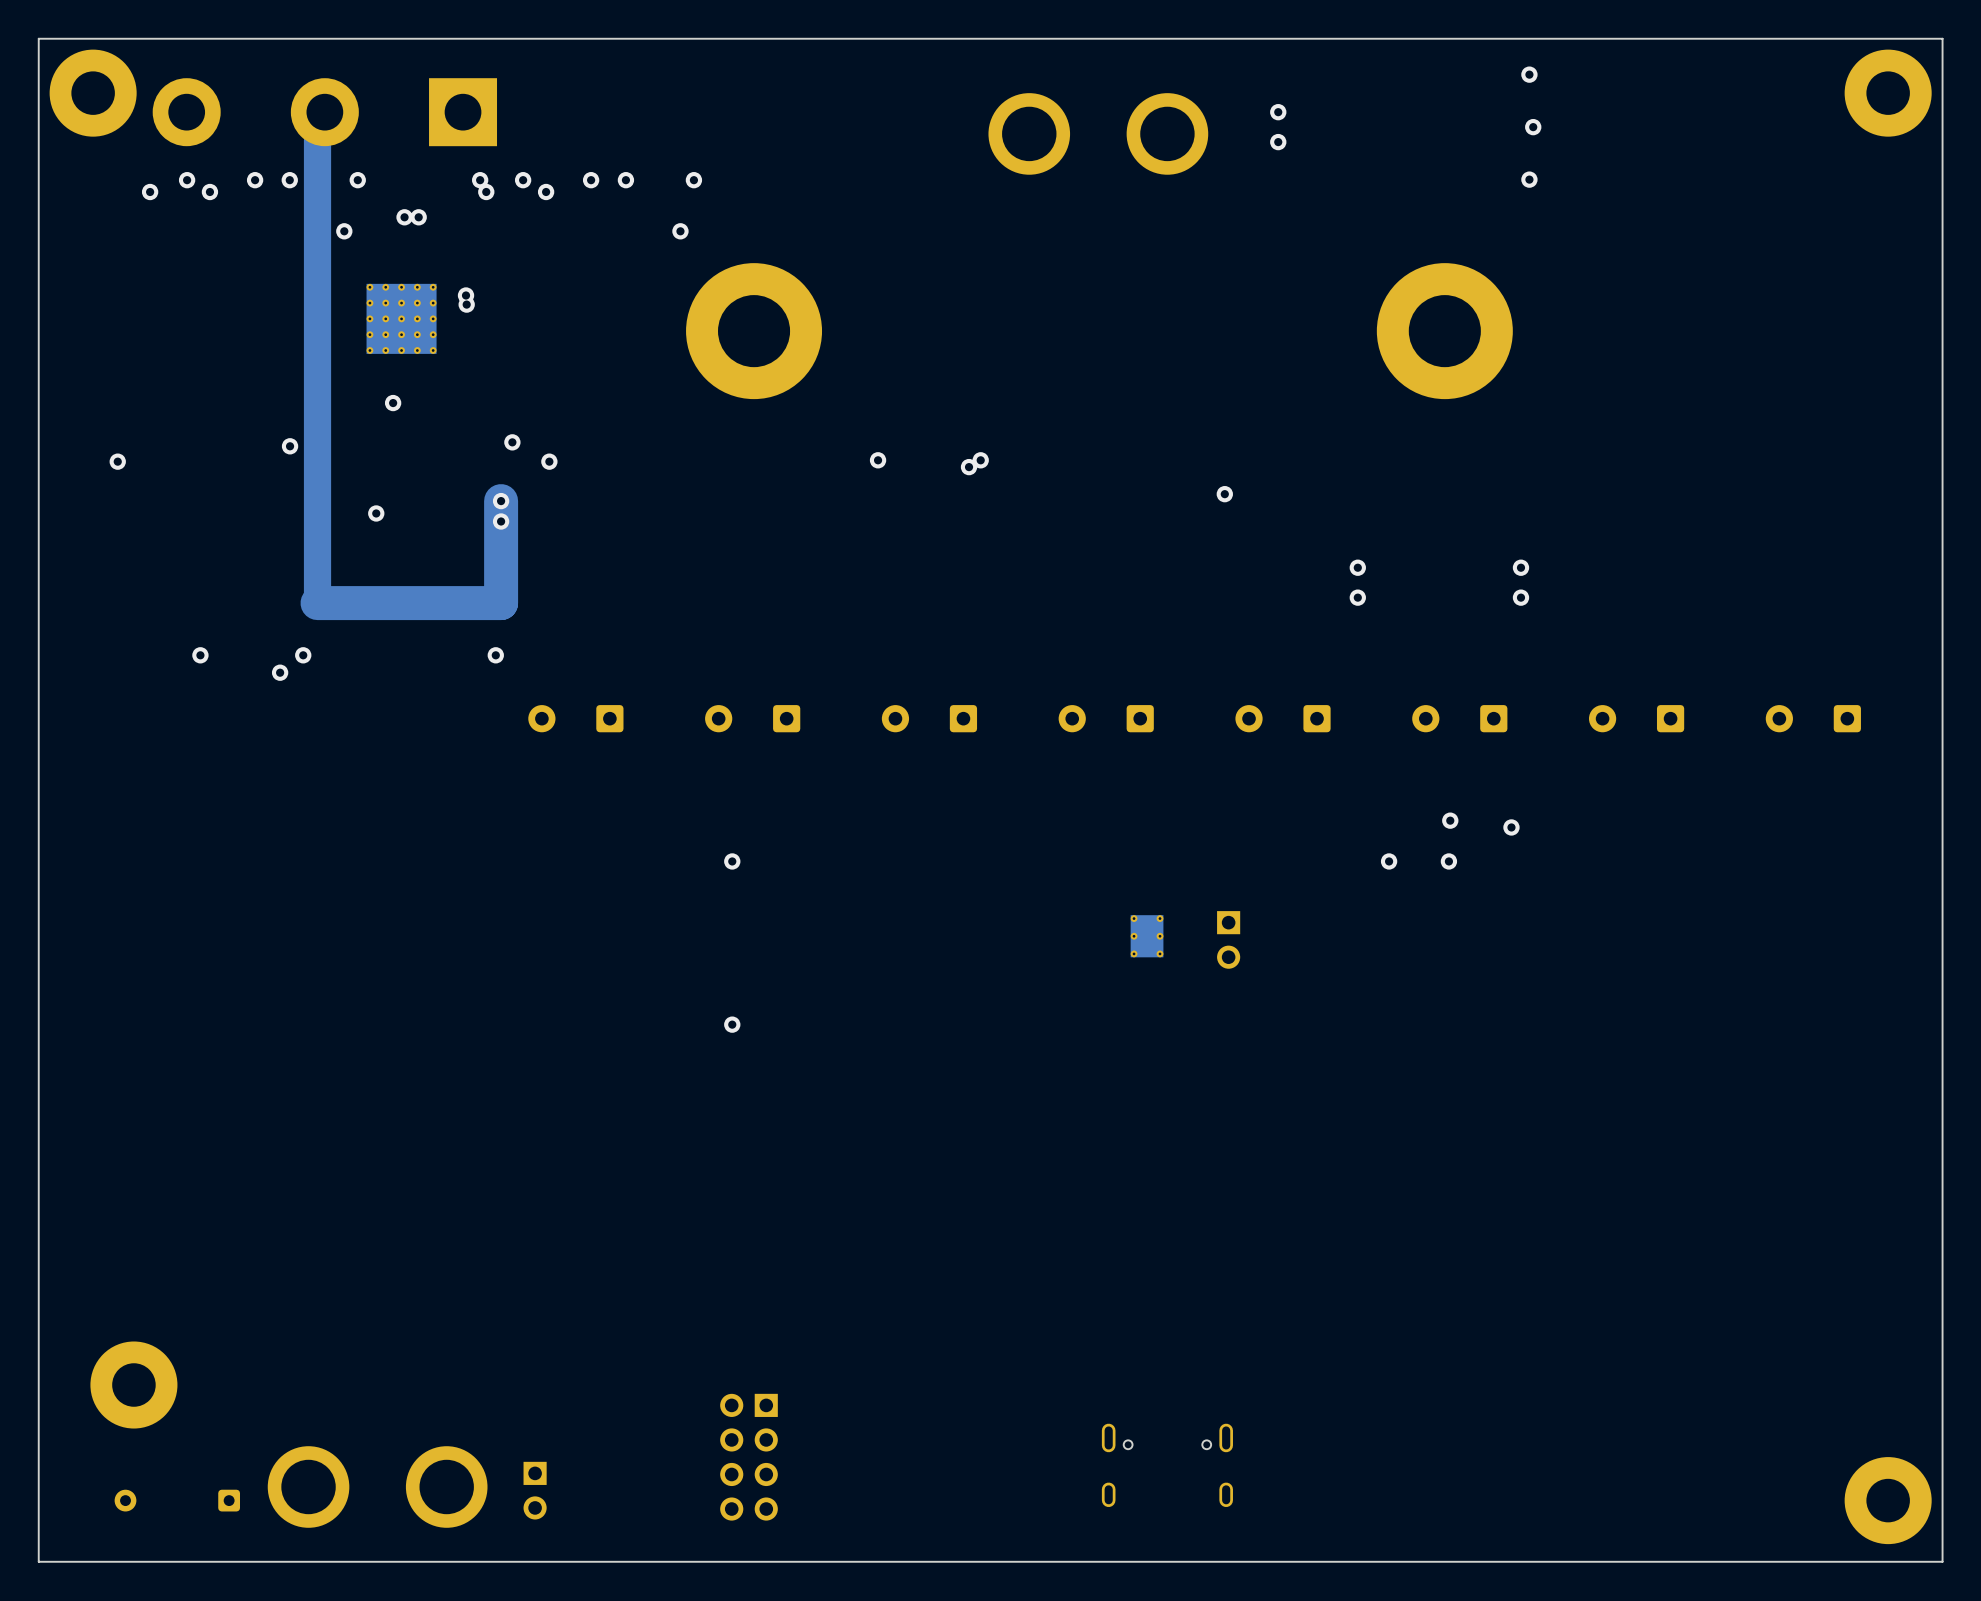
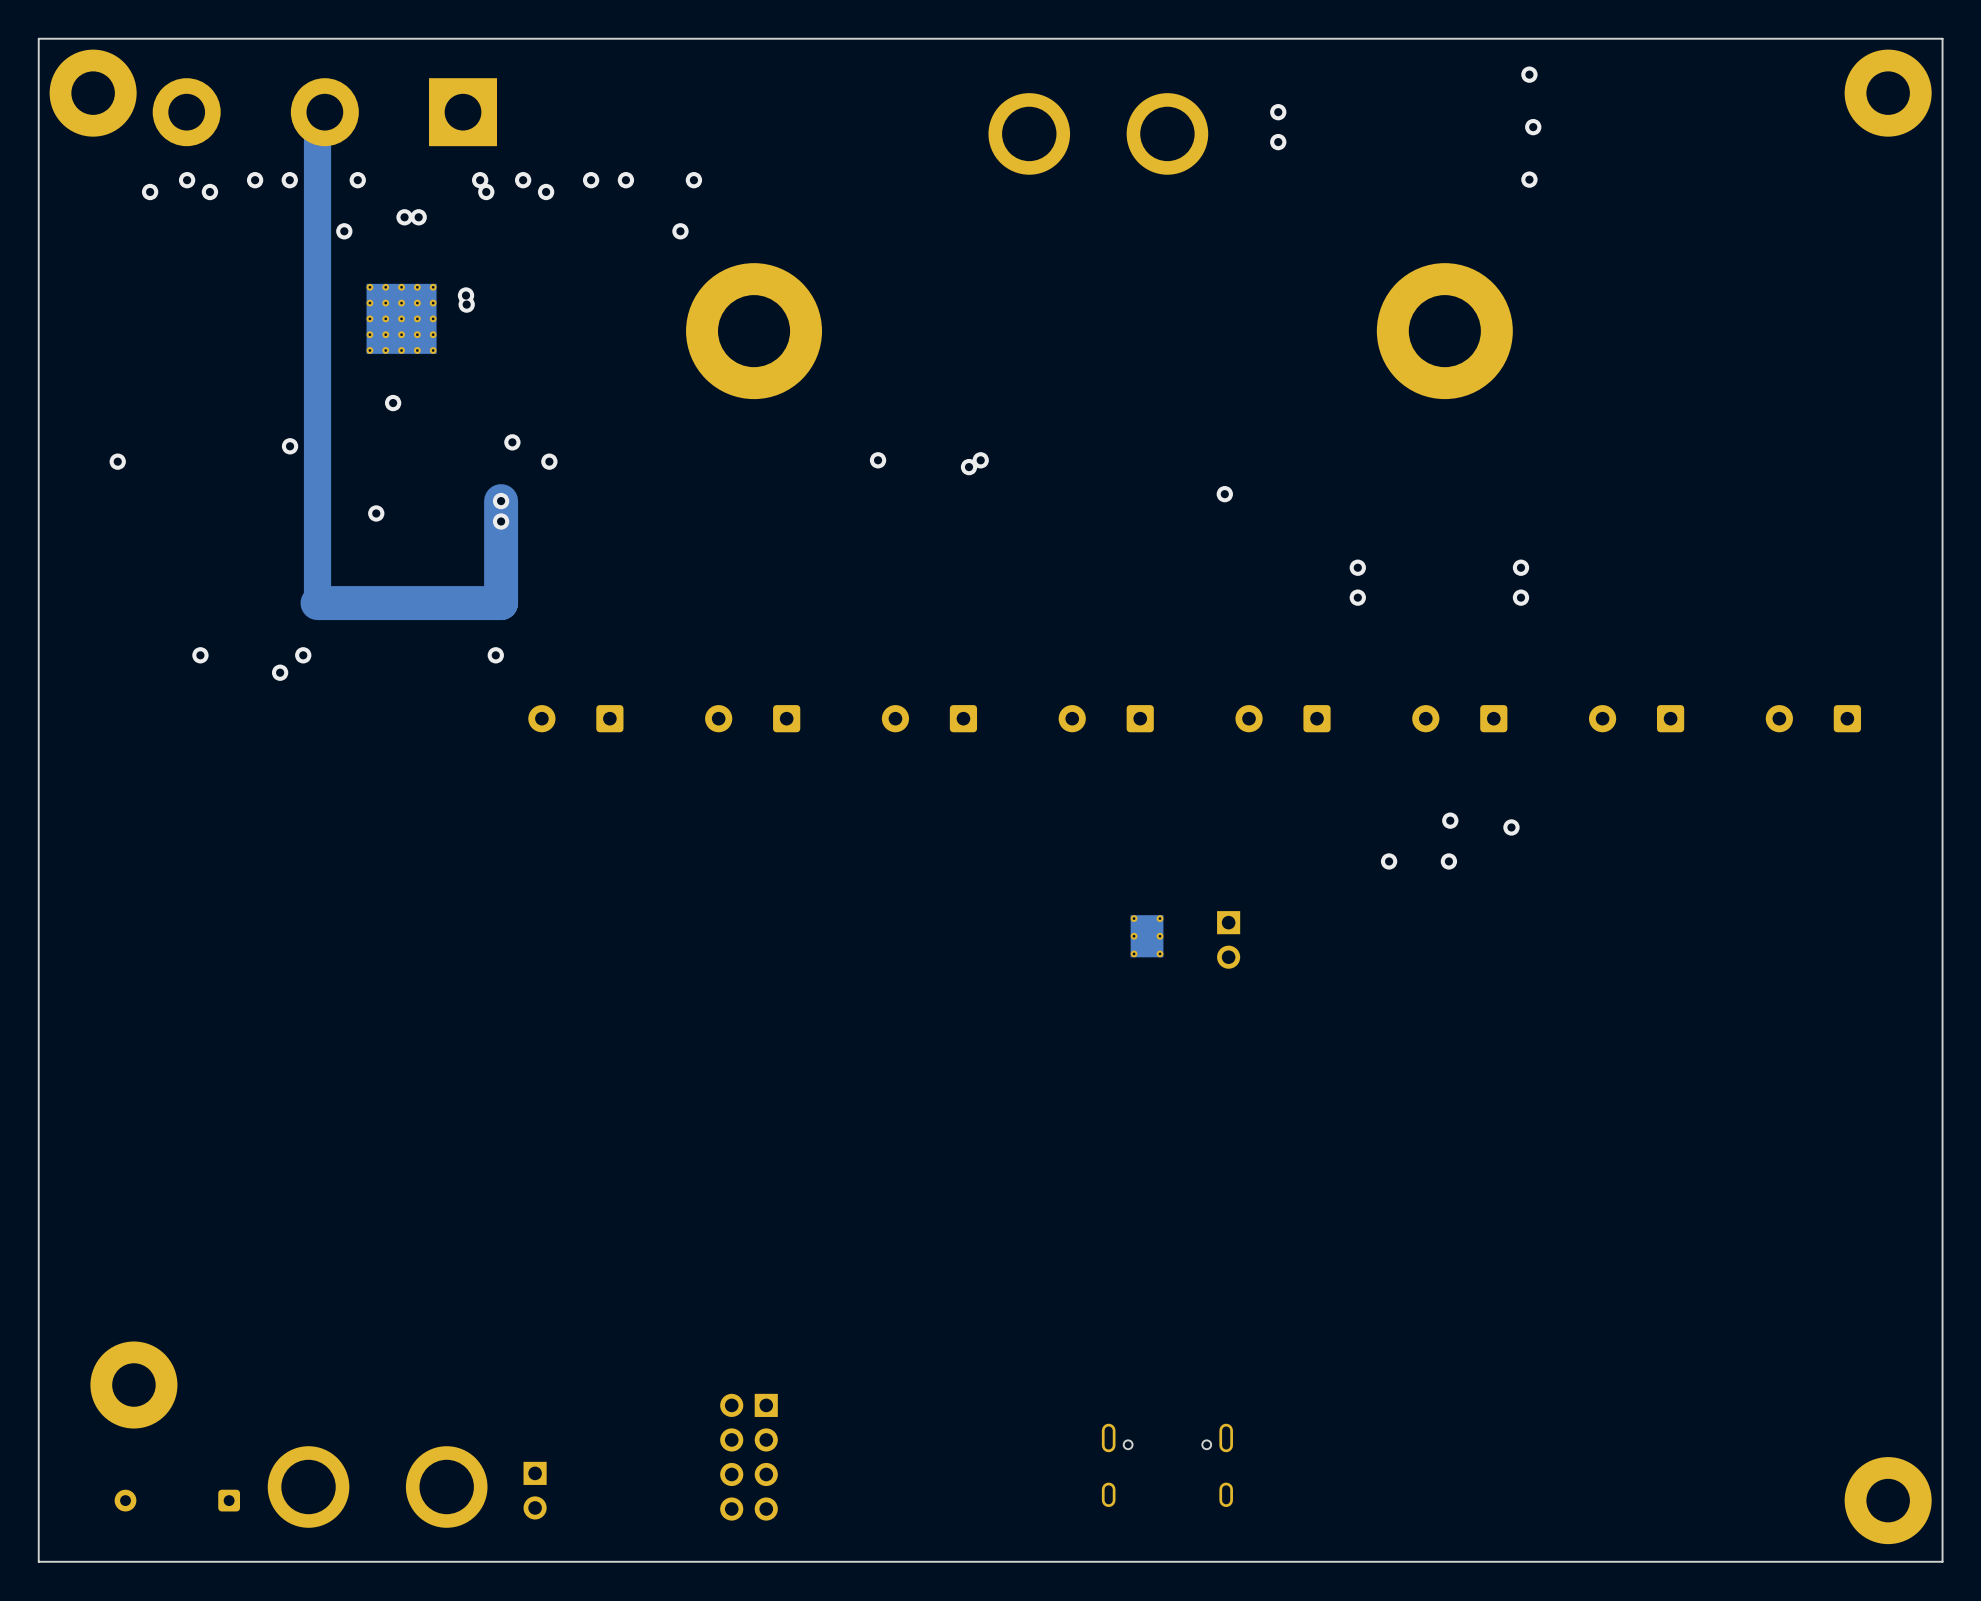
via: (732, 861) -> none
via: (732, 1024) -> none

